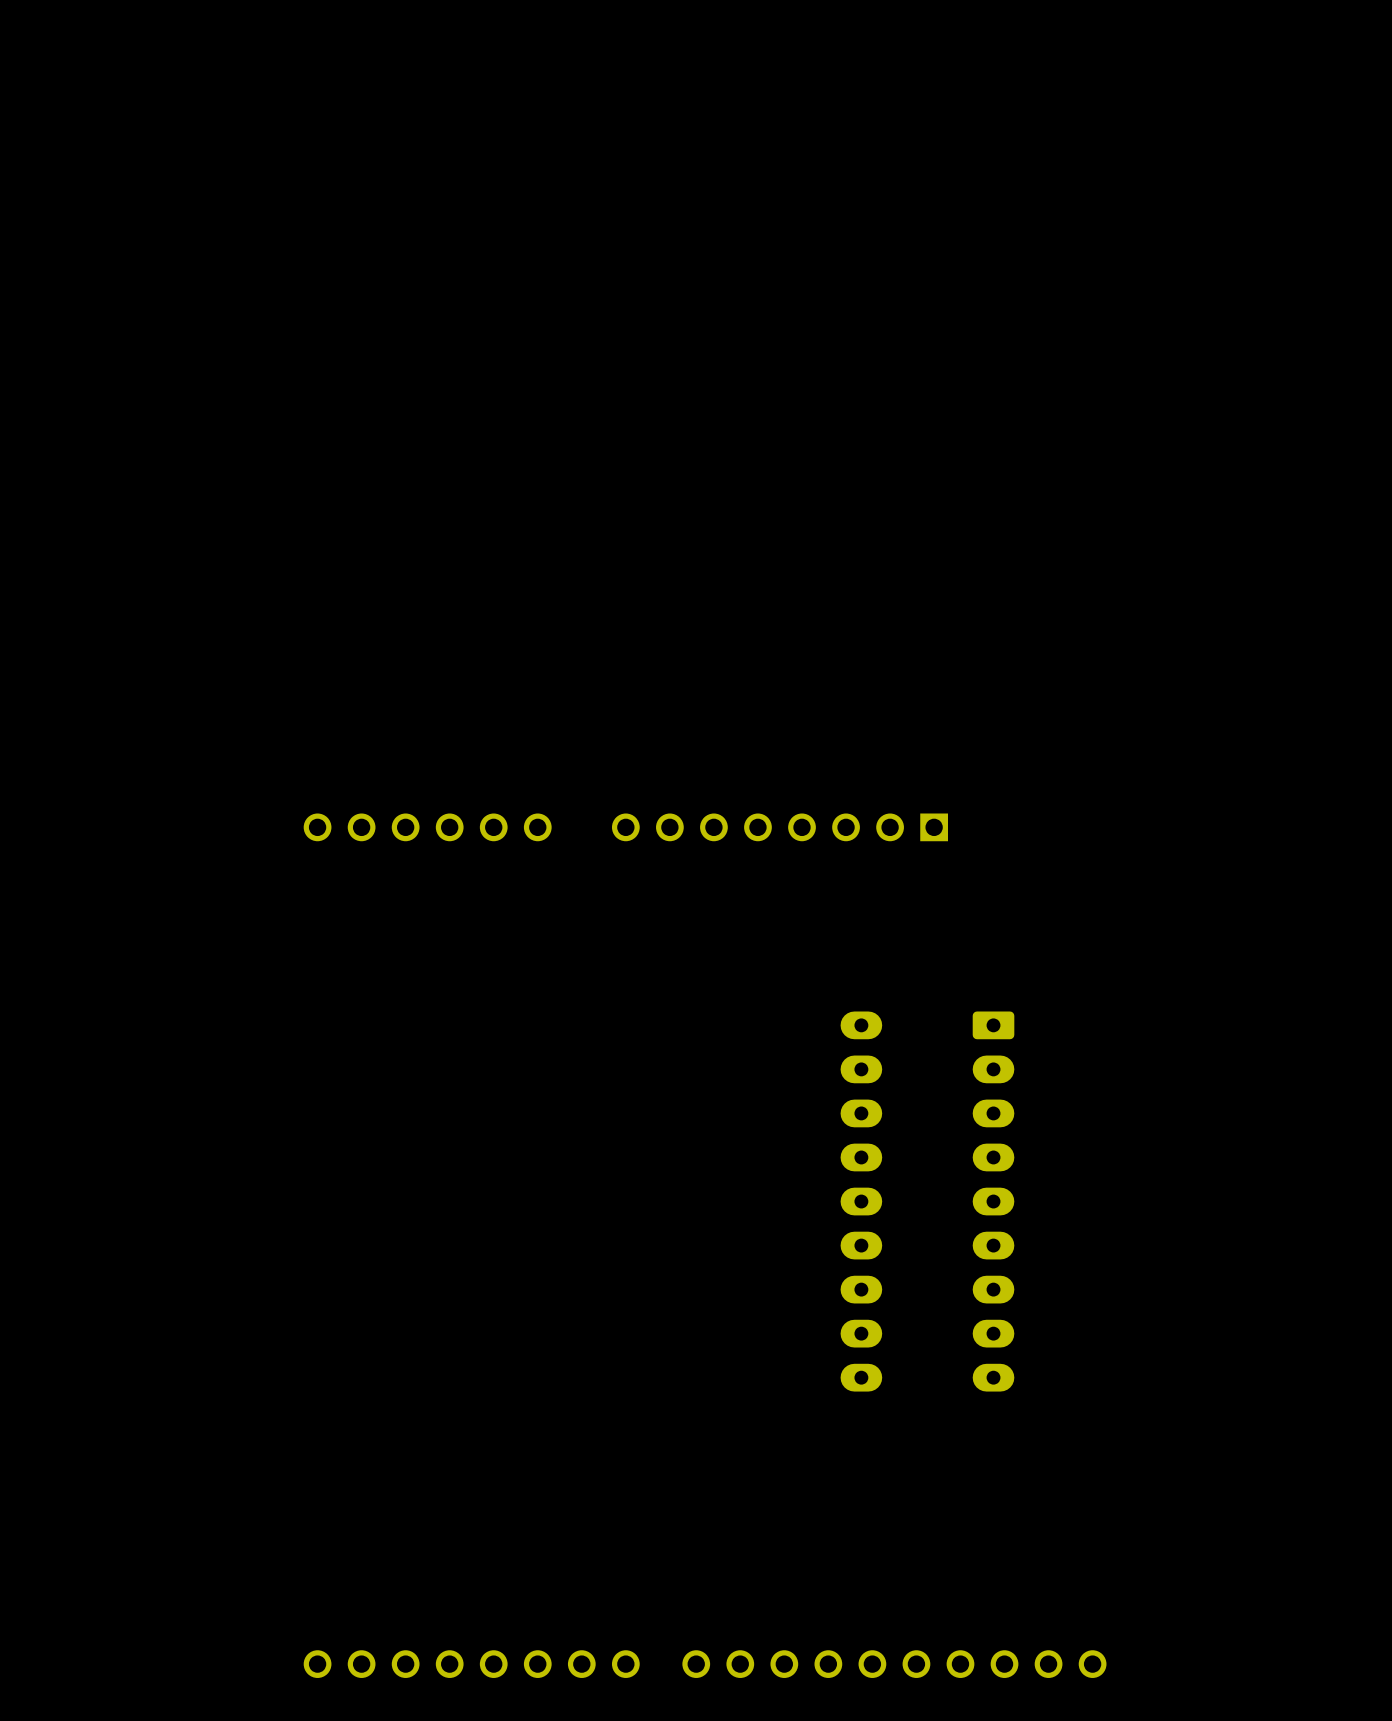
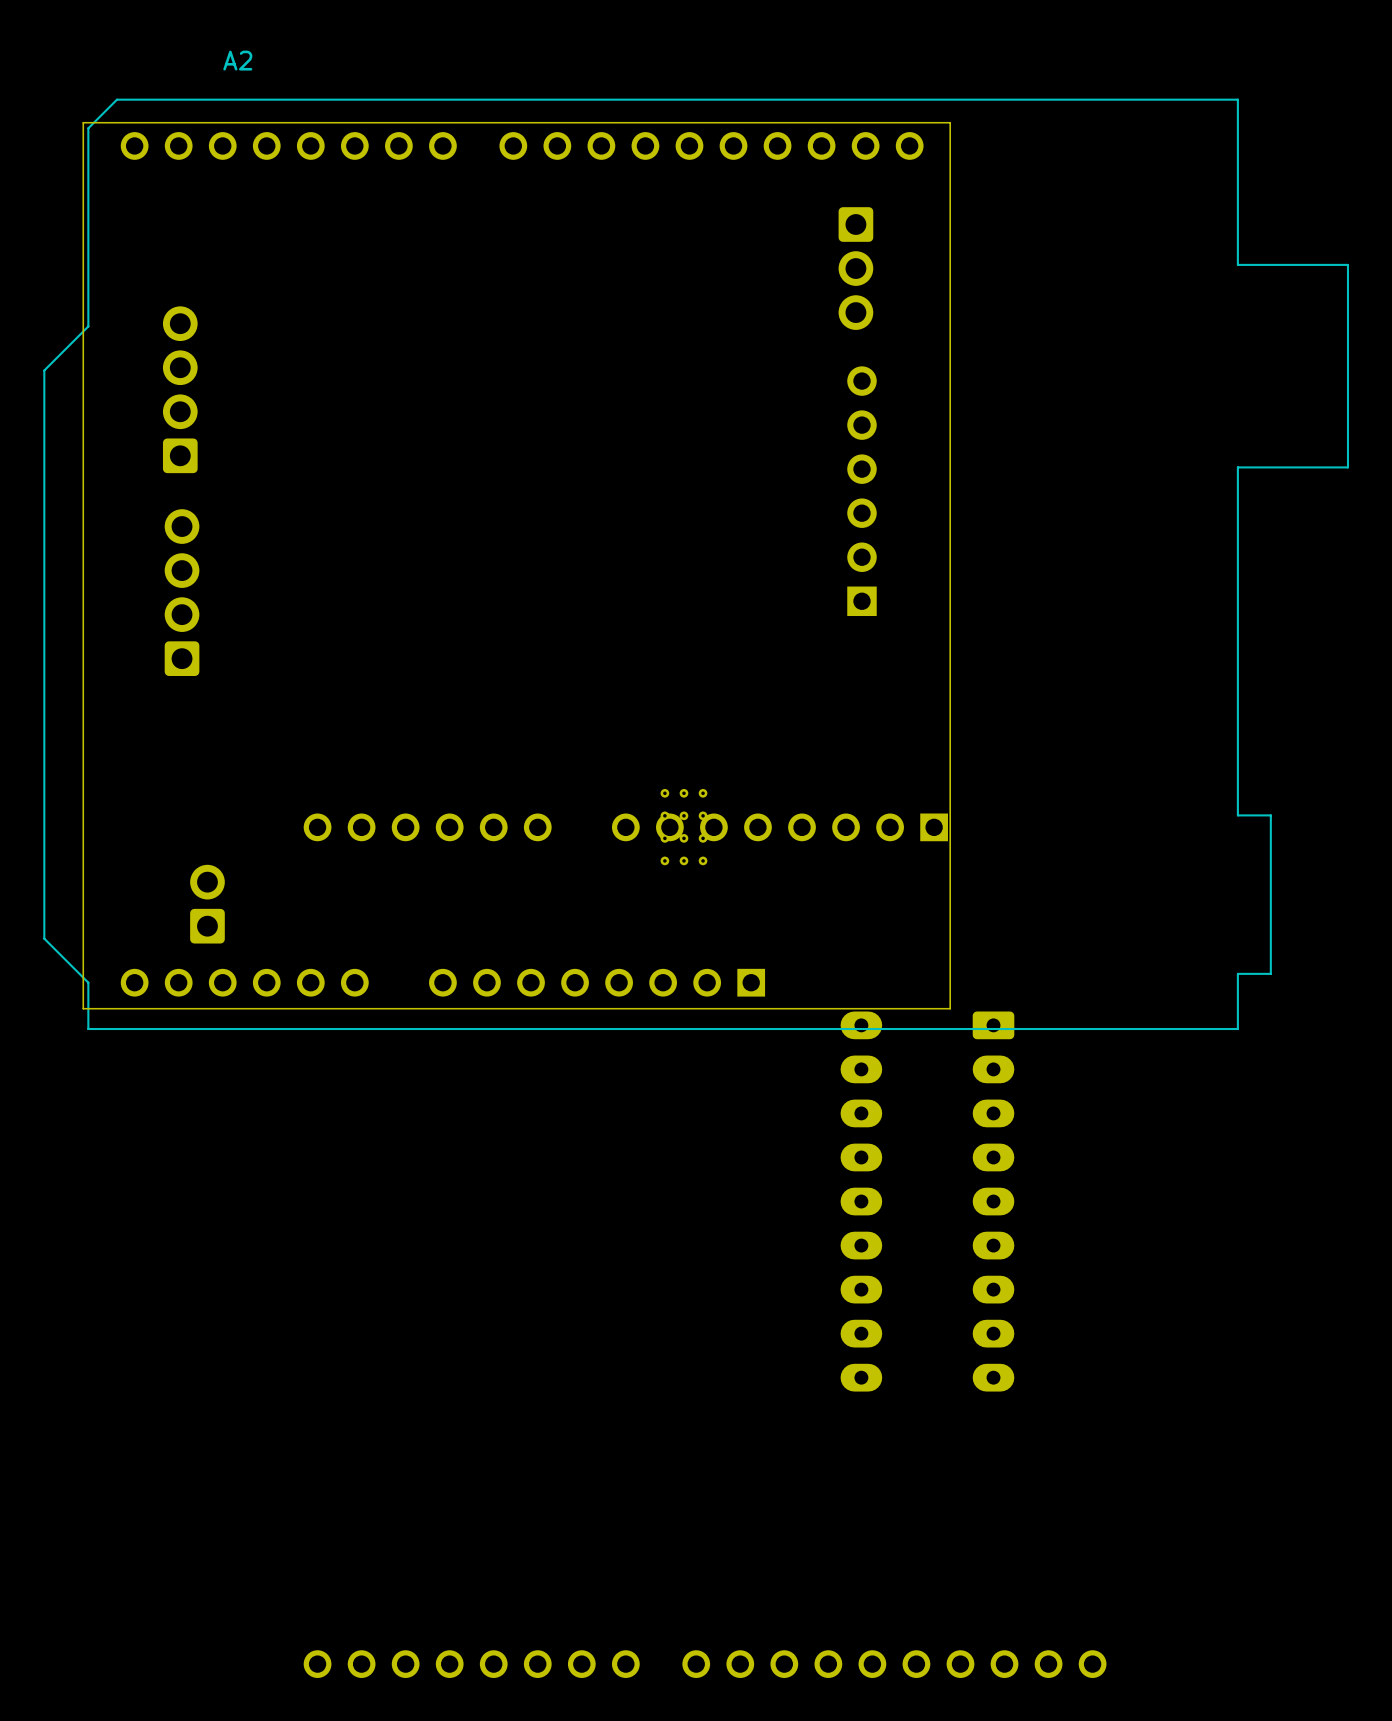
board edge: none -> (950, 122) (950, 1008) (83, 1008) (83, 122) (950, 122)
part: none -> (855, 268)
part: none -> (180, 389)
part: none -> (861, 491)
A2: none -> (696, 564)
part: none -> (182, 592)
part: none -> (683, 827)
part: none -> (207, 904)

